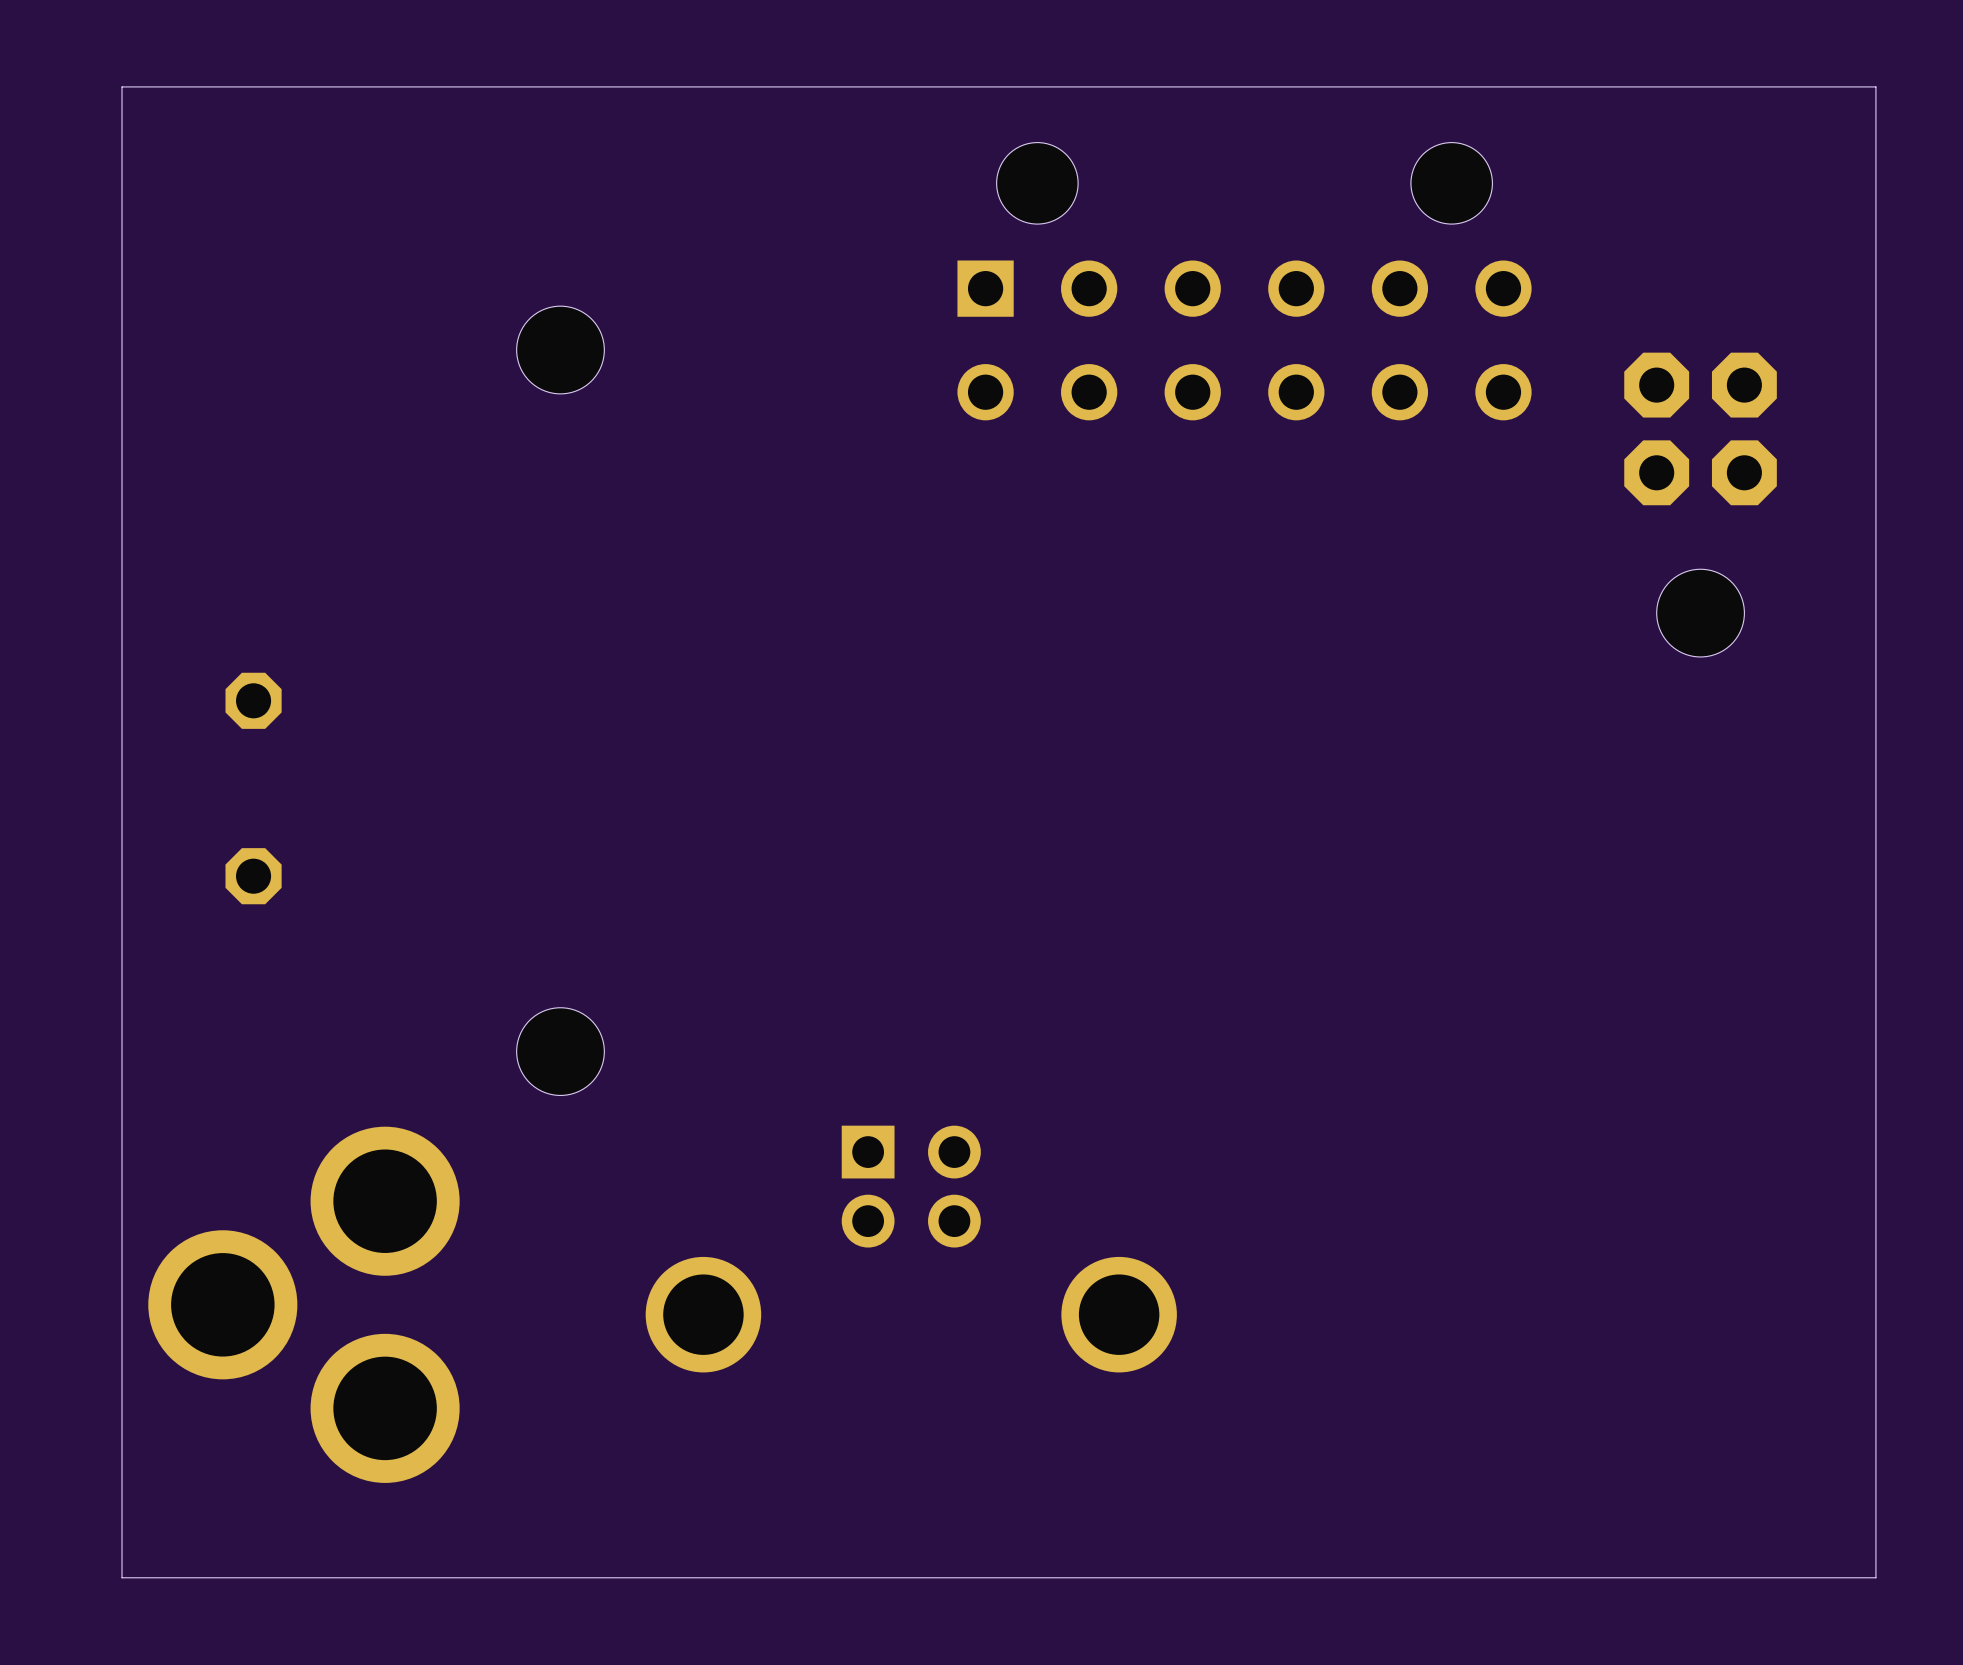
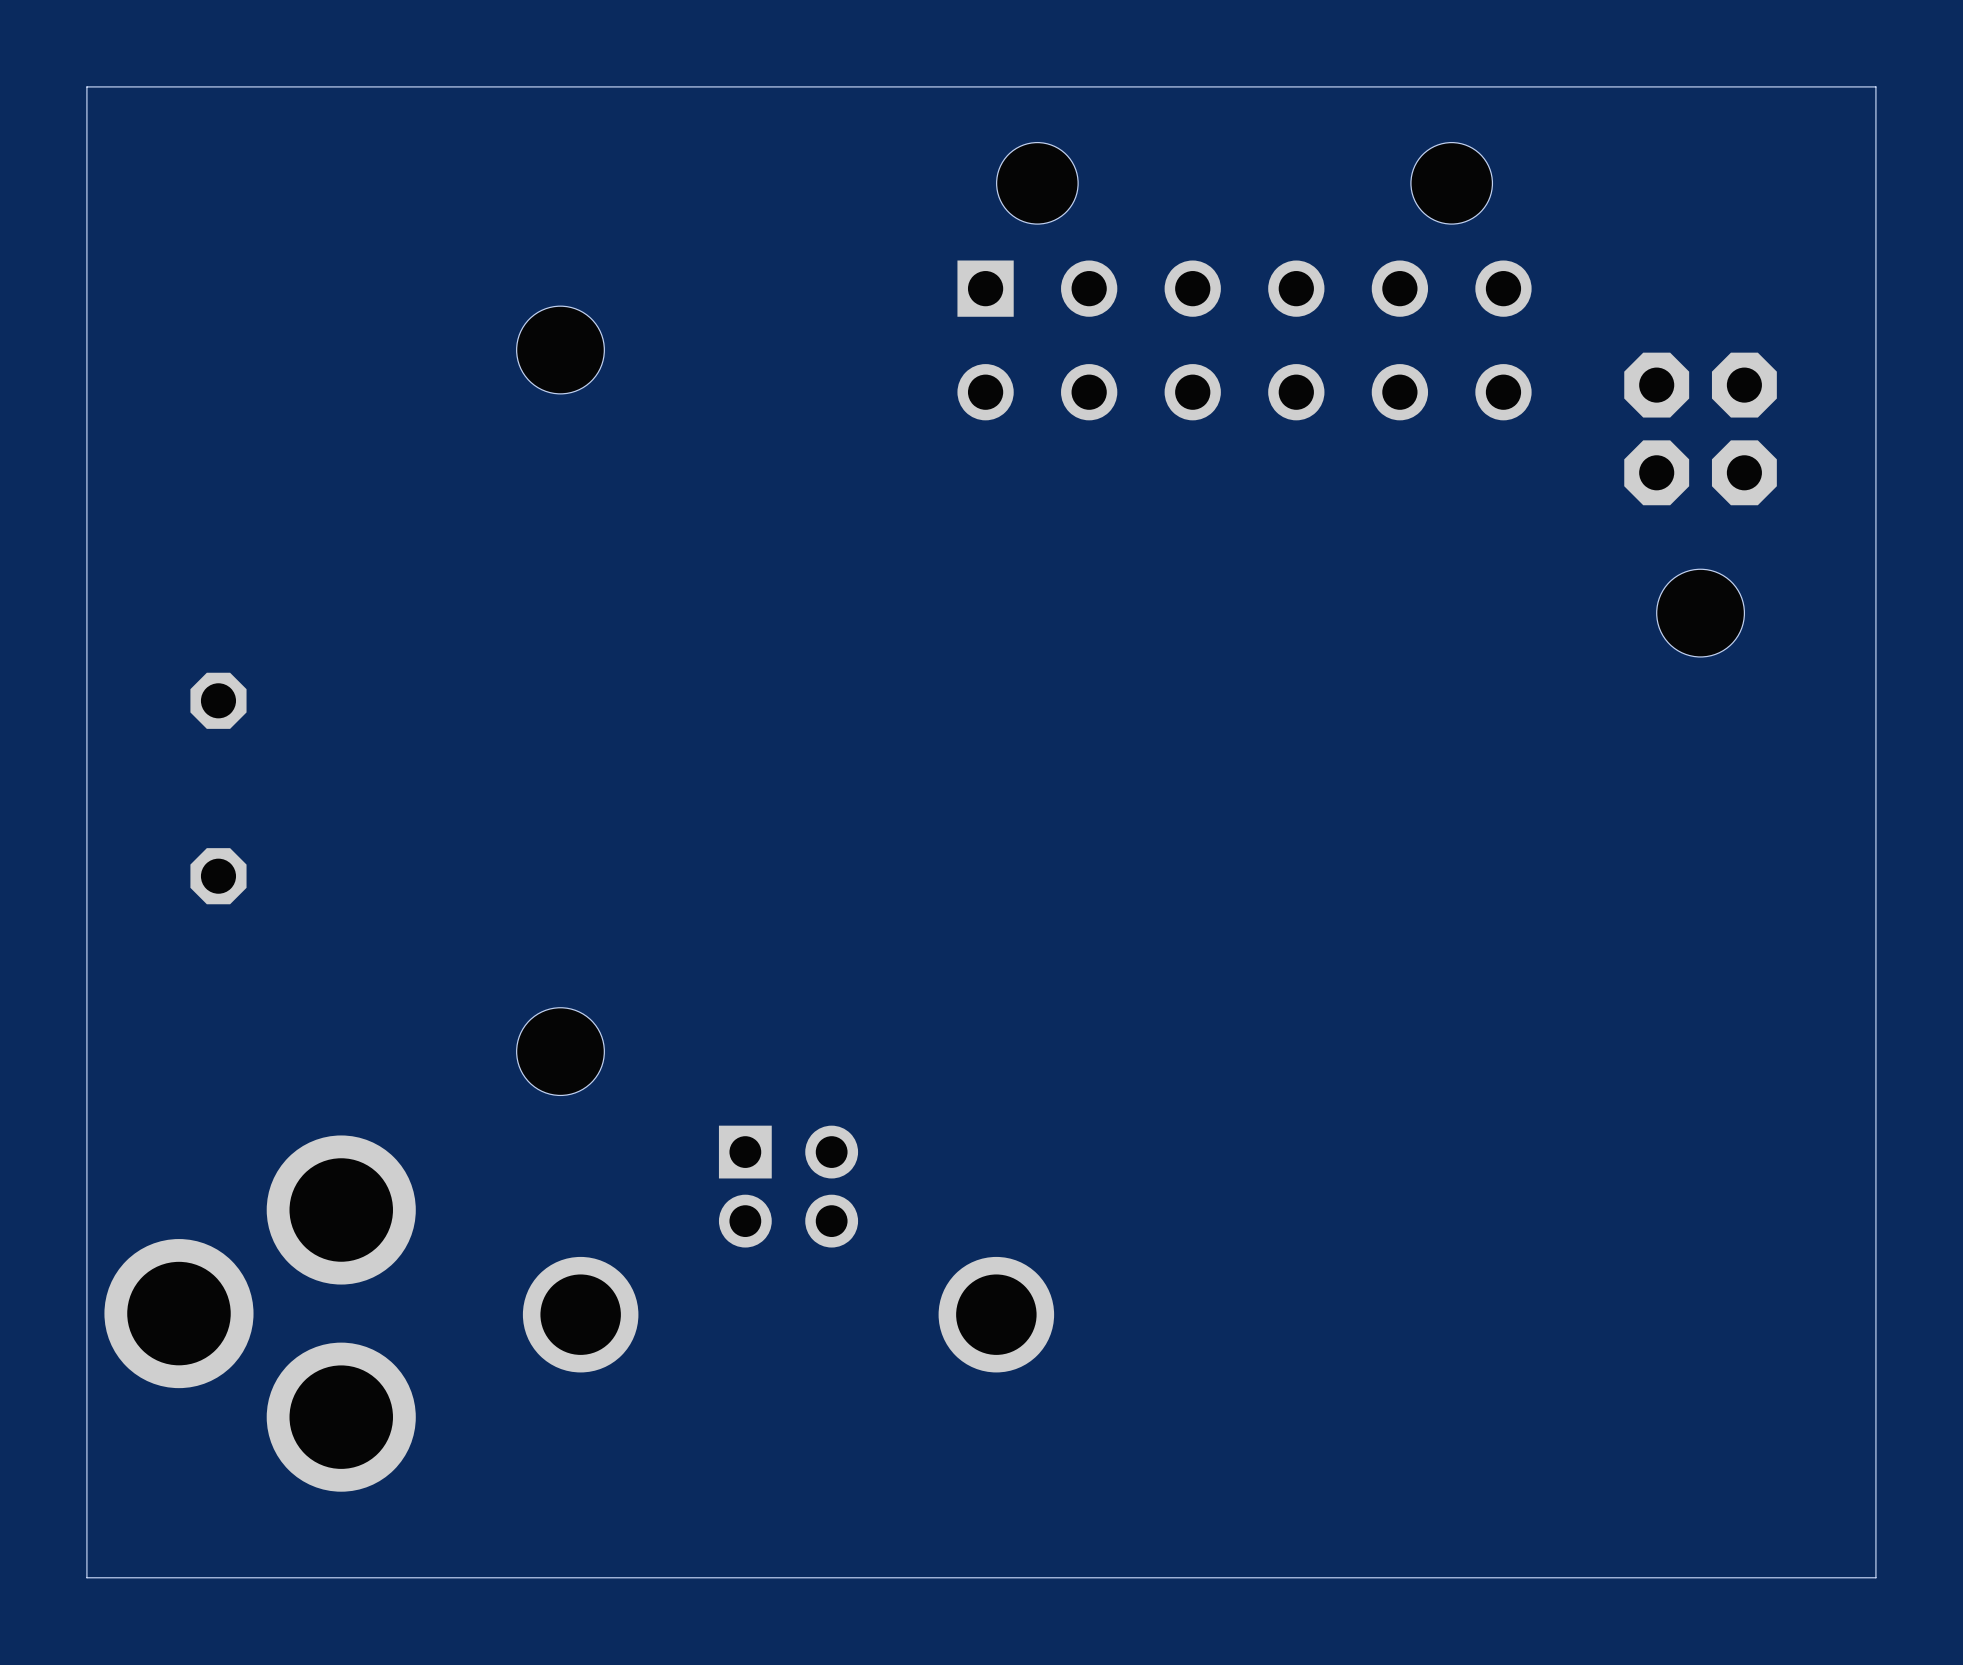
board edge: (122, 86) (122, 1577) -> (122, 86) (86, 86) (86, 1577) (122, 1577)
part position: (253, 700) -> (218, 700)
part position: (253, 876) -> (218, 876)
part position: (911, 1249) -> (788, 1249)
part position: (303, 1304) -> (260, 1313)

